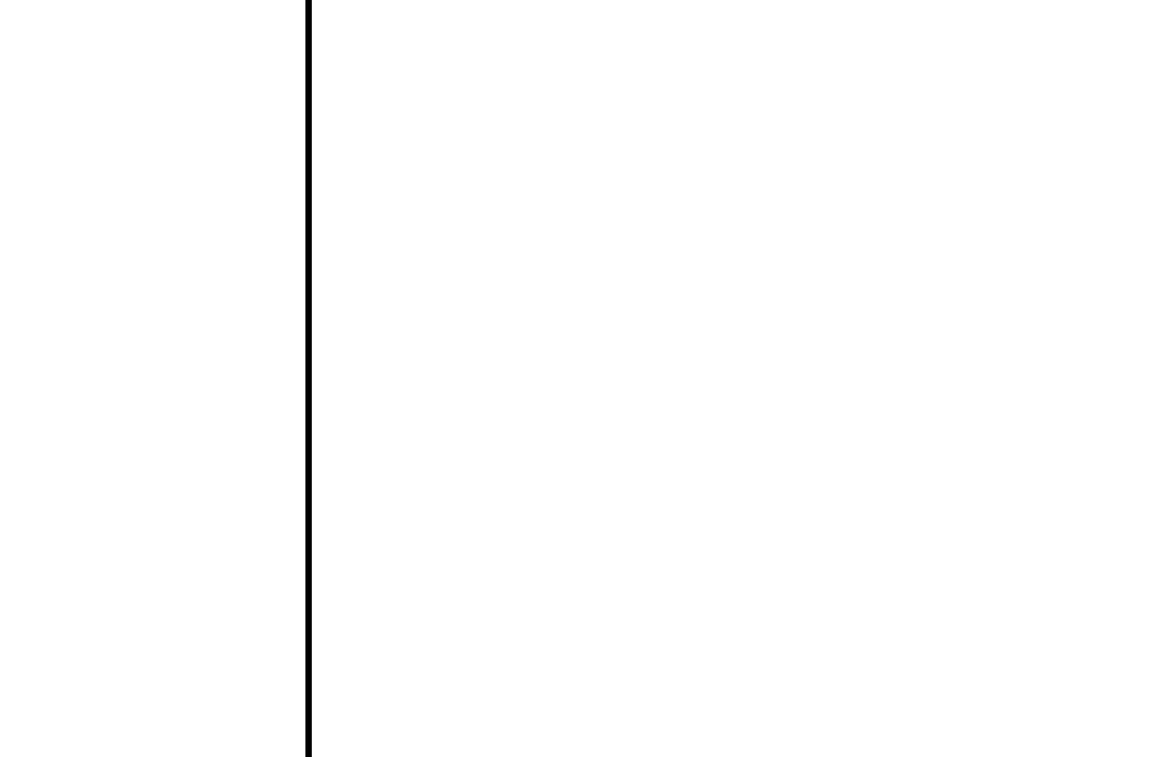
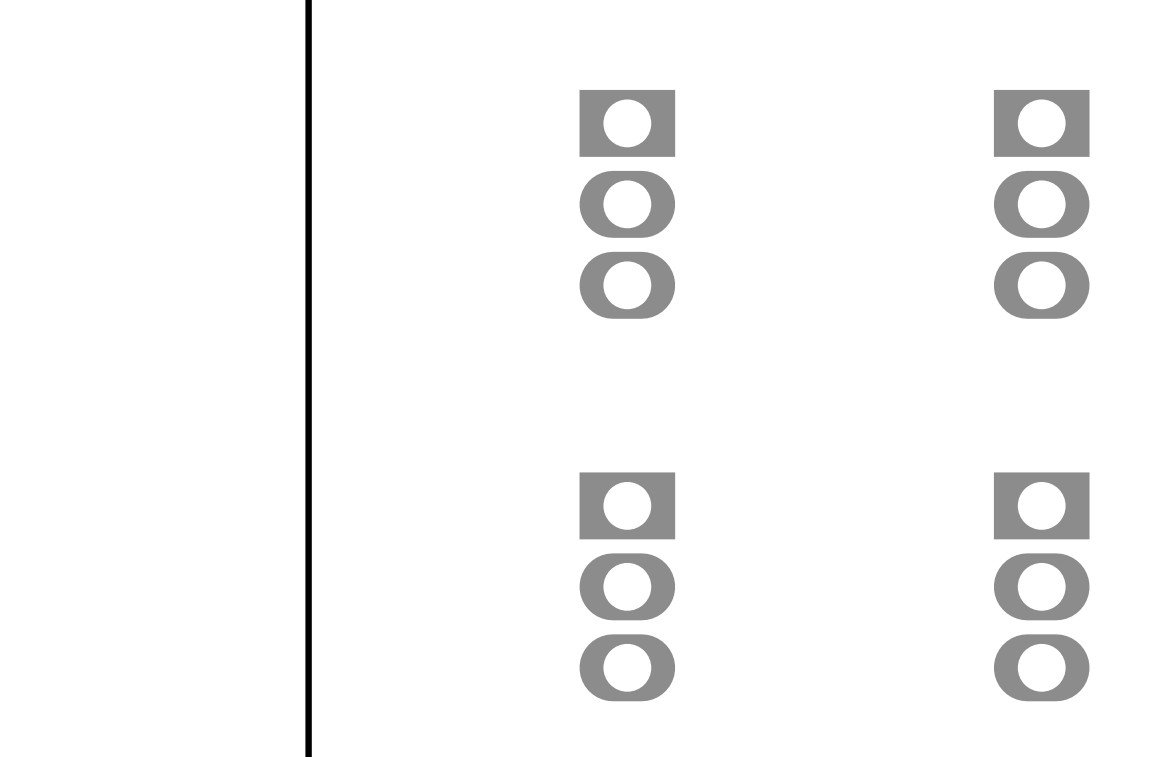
part: none -> (627, 204)
part: none -> (1041, 204)
part: none -> (627, 586)
part: none -> (1041, 586)

